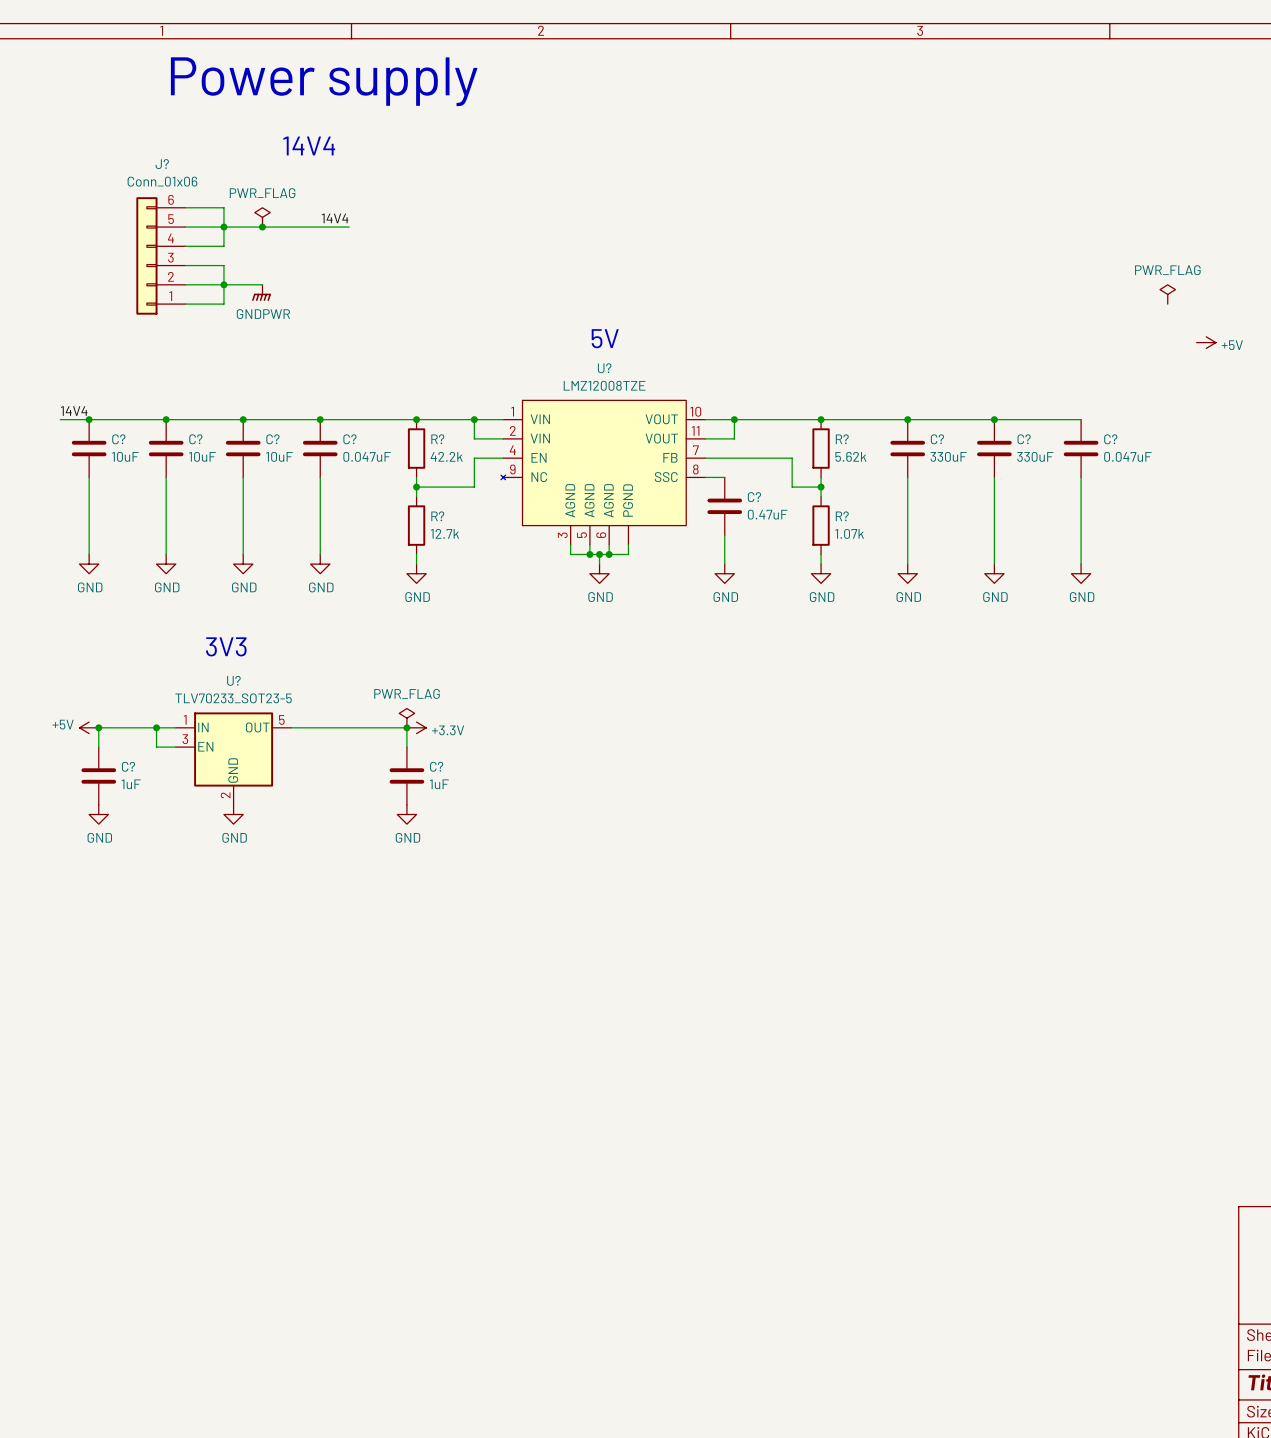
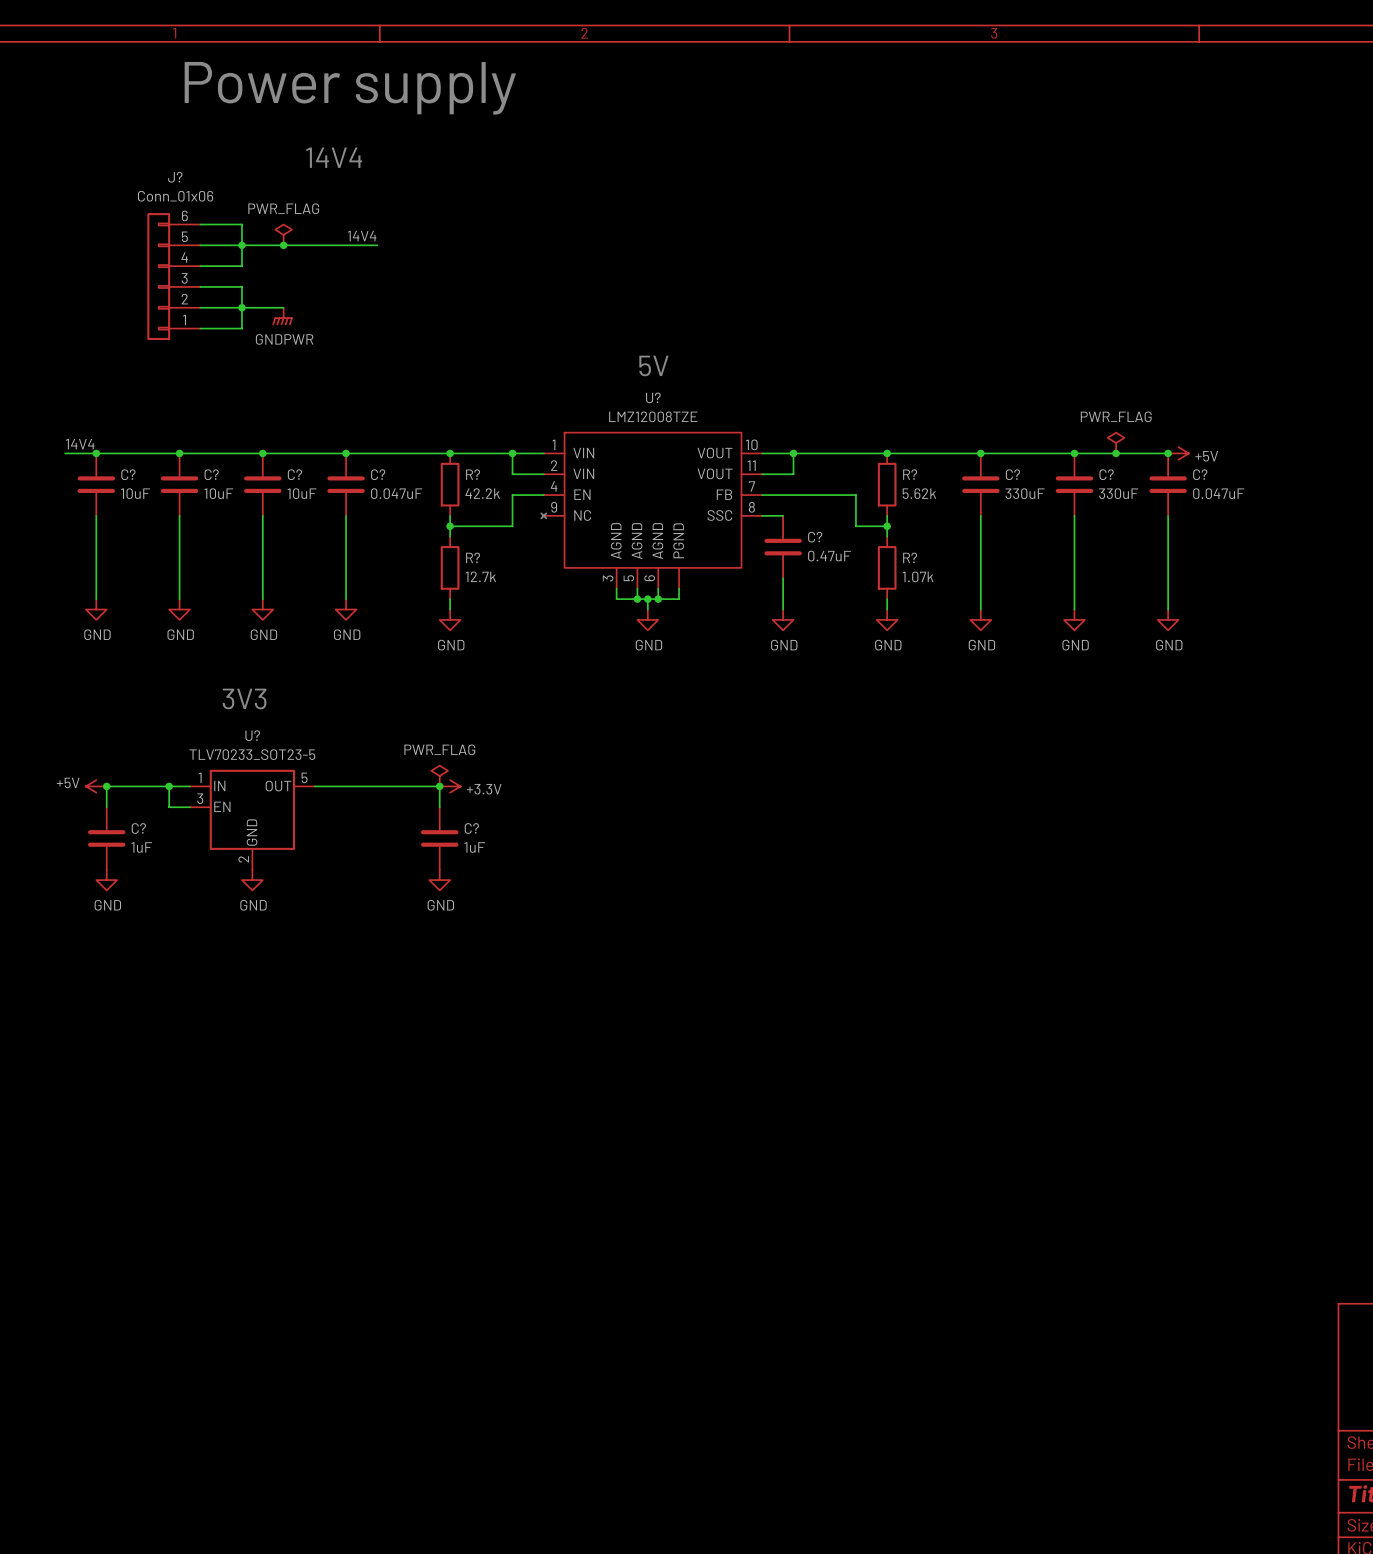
power symbol position: PWR_FLAG (1167, 294) -> PWR_FLAG (1116, 443)
power symbol position: +5V (1206, 342) -> +5V (1178, 453)
junction: none -> (1116, 453)
junction: none -> (1168, 453)

